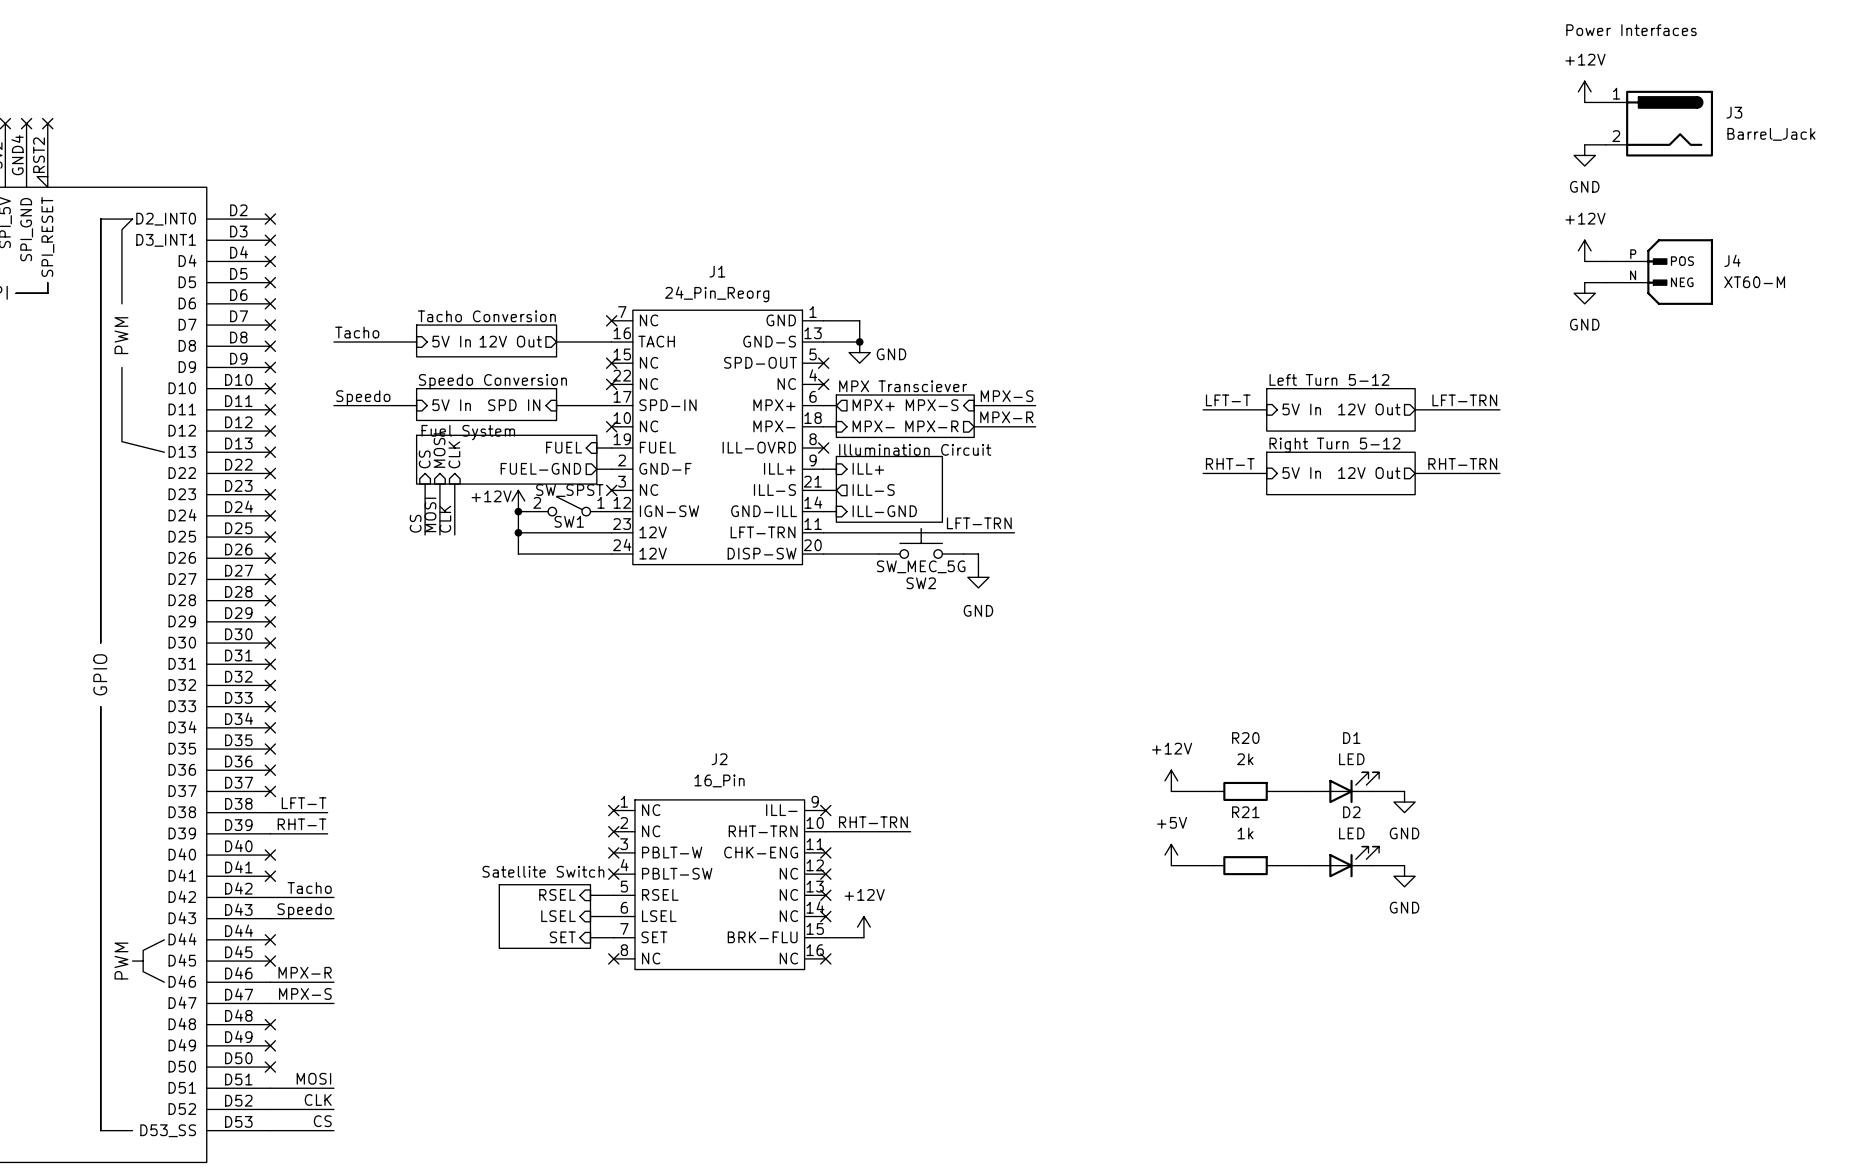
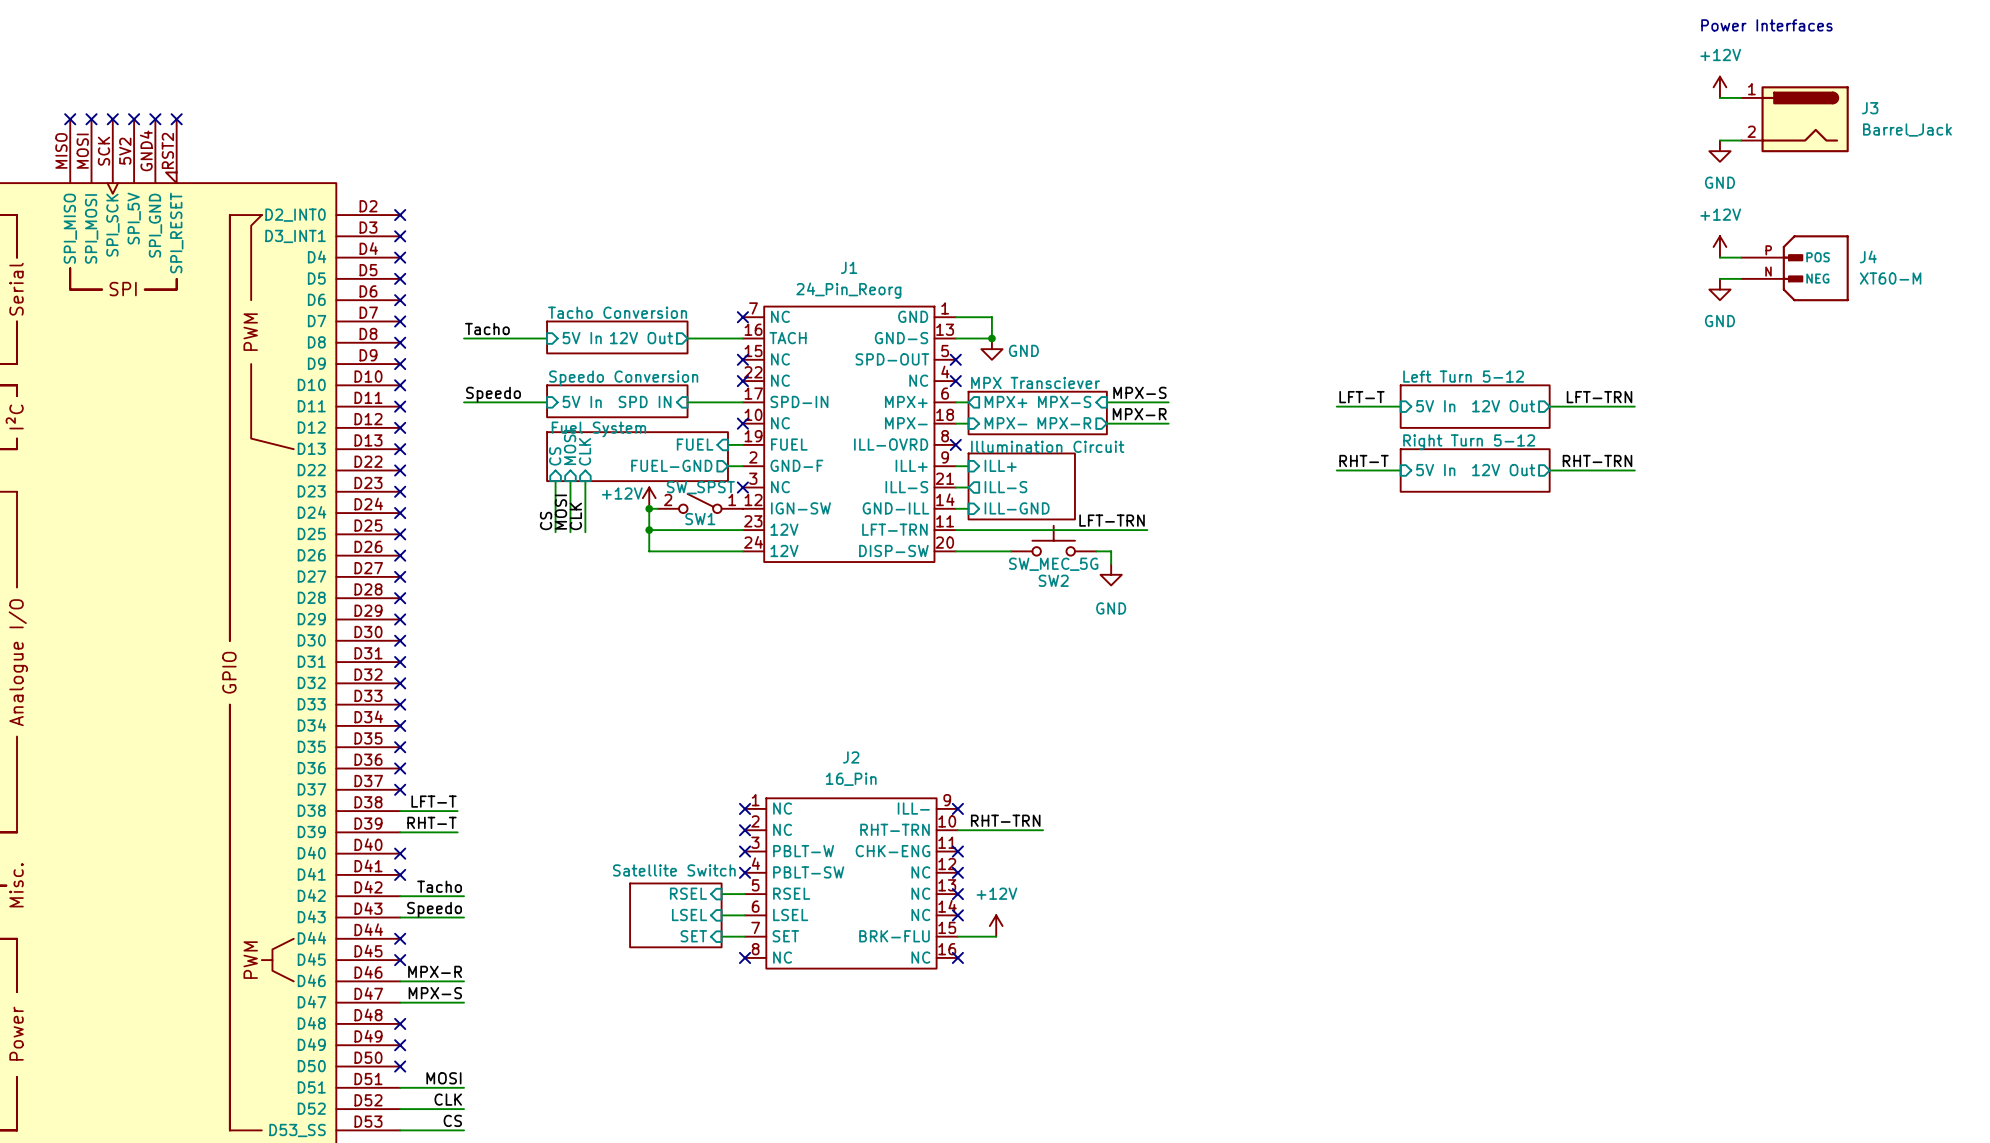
power symbol: +12V (1171, 780) -> none
D1: LED (1344, 787) -> none
wire: (1171, 791) (1213, 791) -> none
R20: 2k (1245, 791) -> none
wire: (1277, 791) (1309, 791) -> none
wire: (1372, 791) (1404, 791) -> none
power symbol: GND (1404, 802) -> none
power symbol: +5V (1171, 855) -> none
D2: LED (1344, 861) -> none
wire: (1171, 865) (1213, 865) -> none
R21: 1k (1245, 865) -> none
wire: (1277, 865) (1309, 865) -> none
wire: (1372, 865) (1404, 865) -> none
power symbol: GND (1404, 876) -> none

